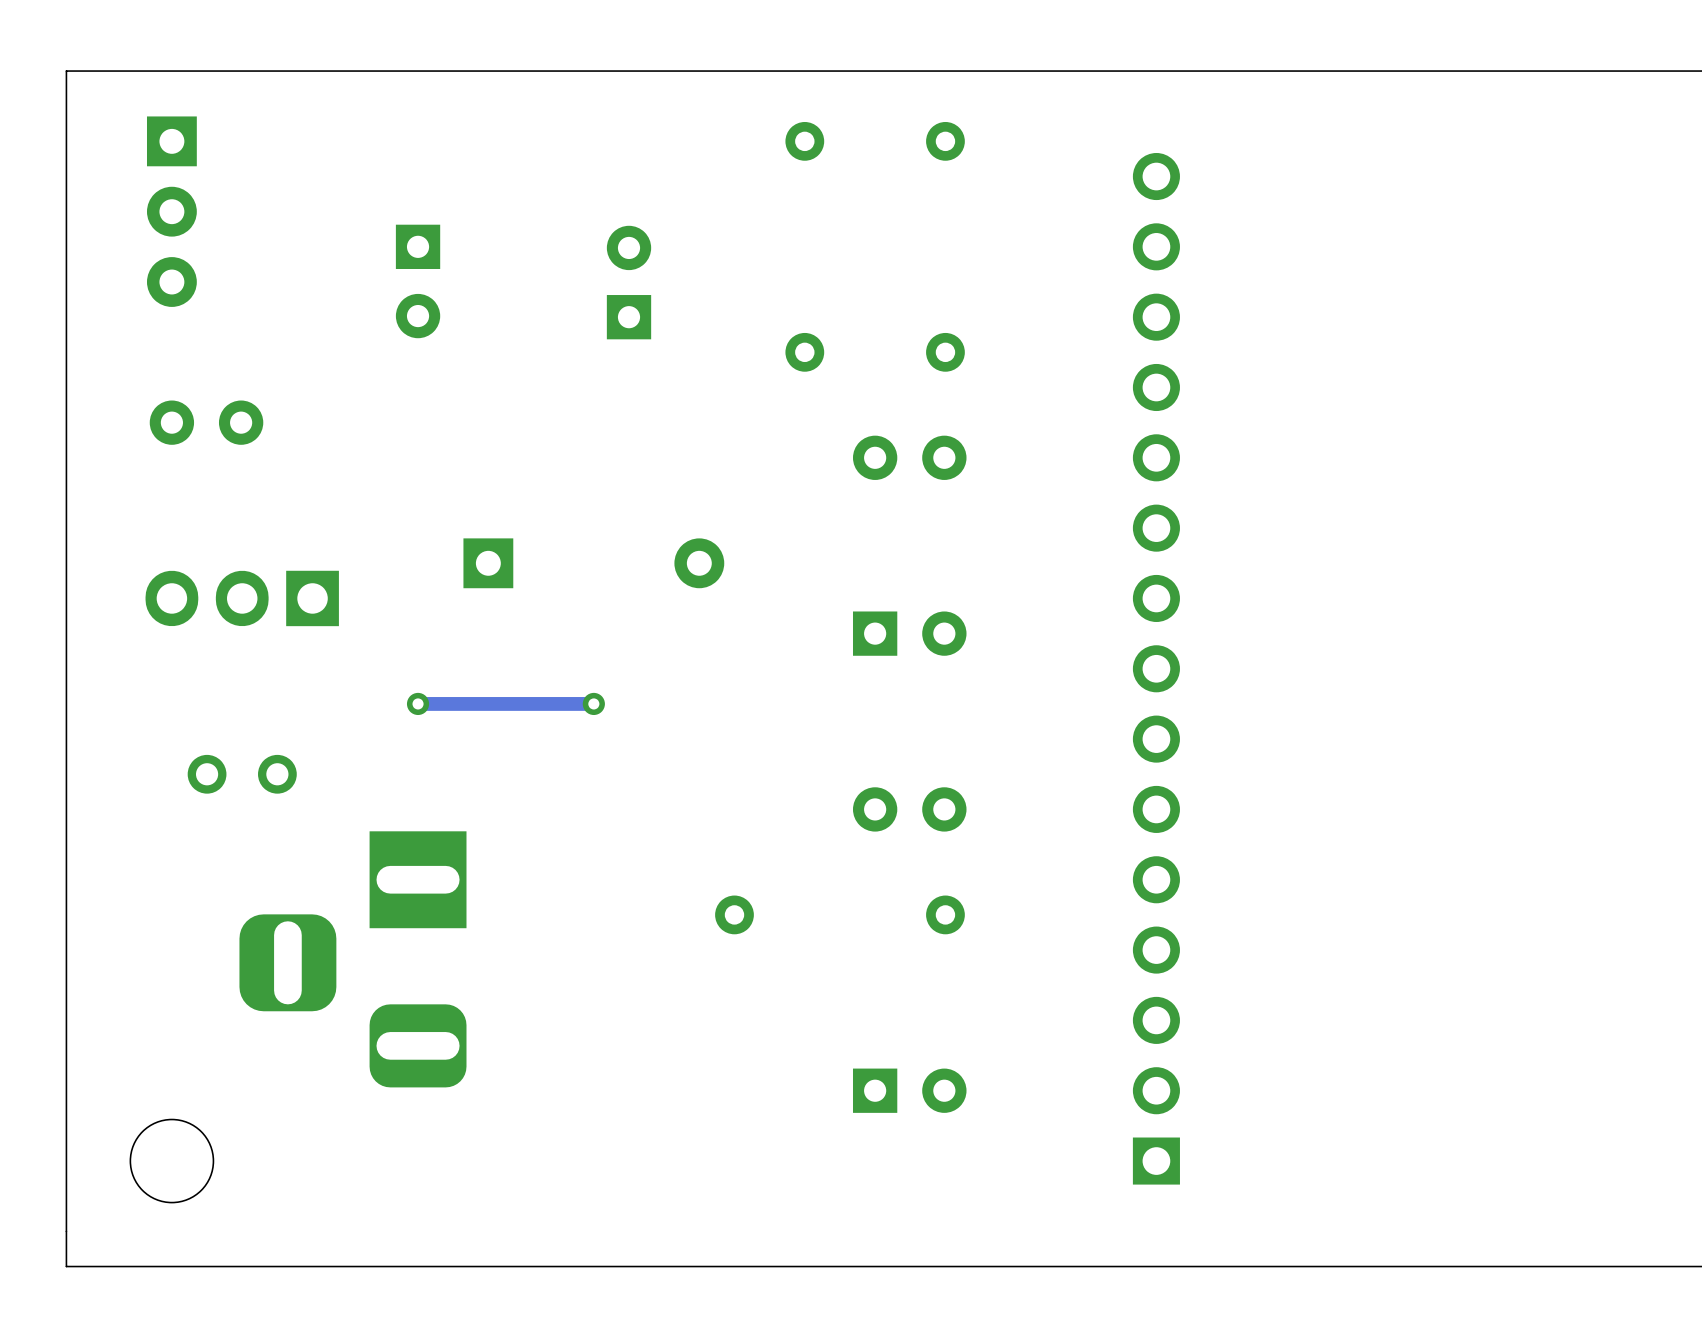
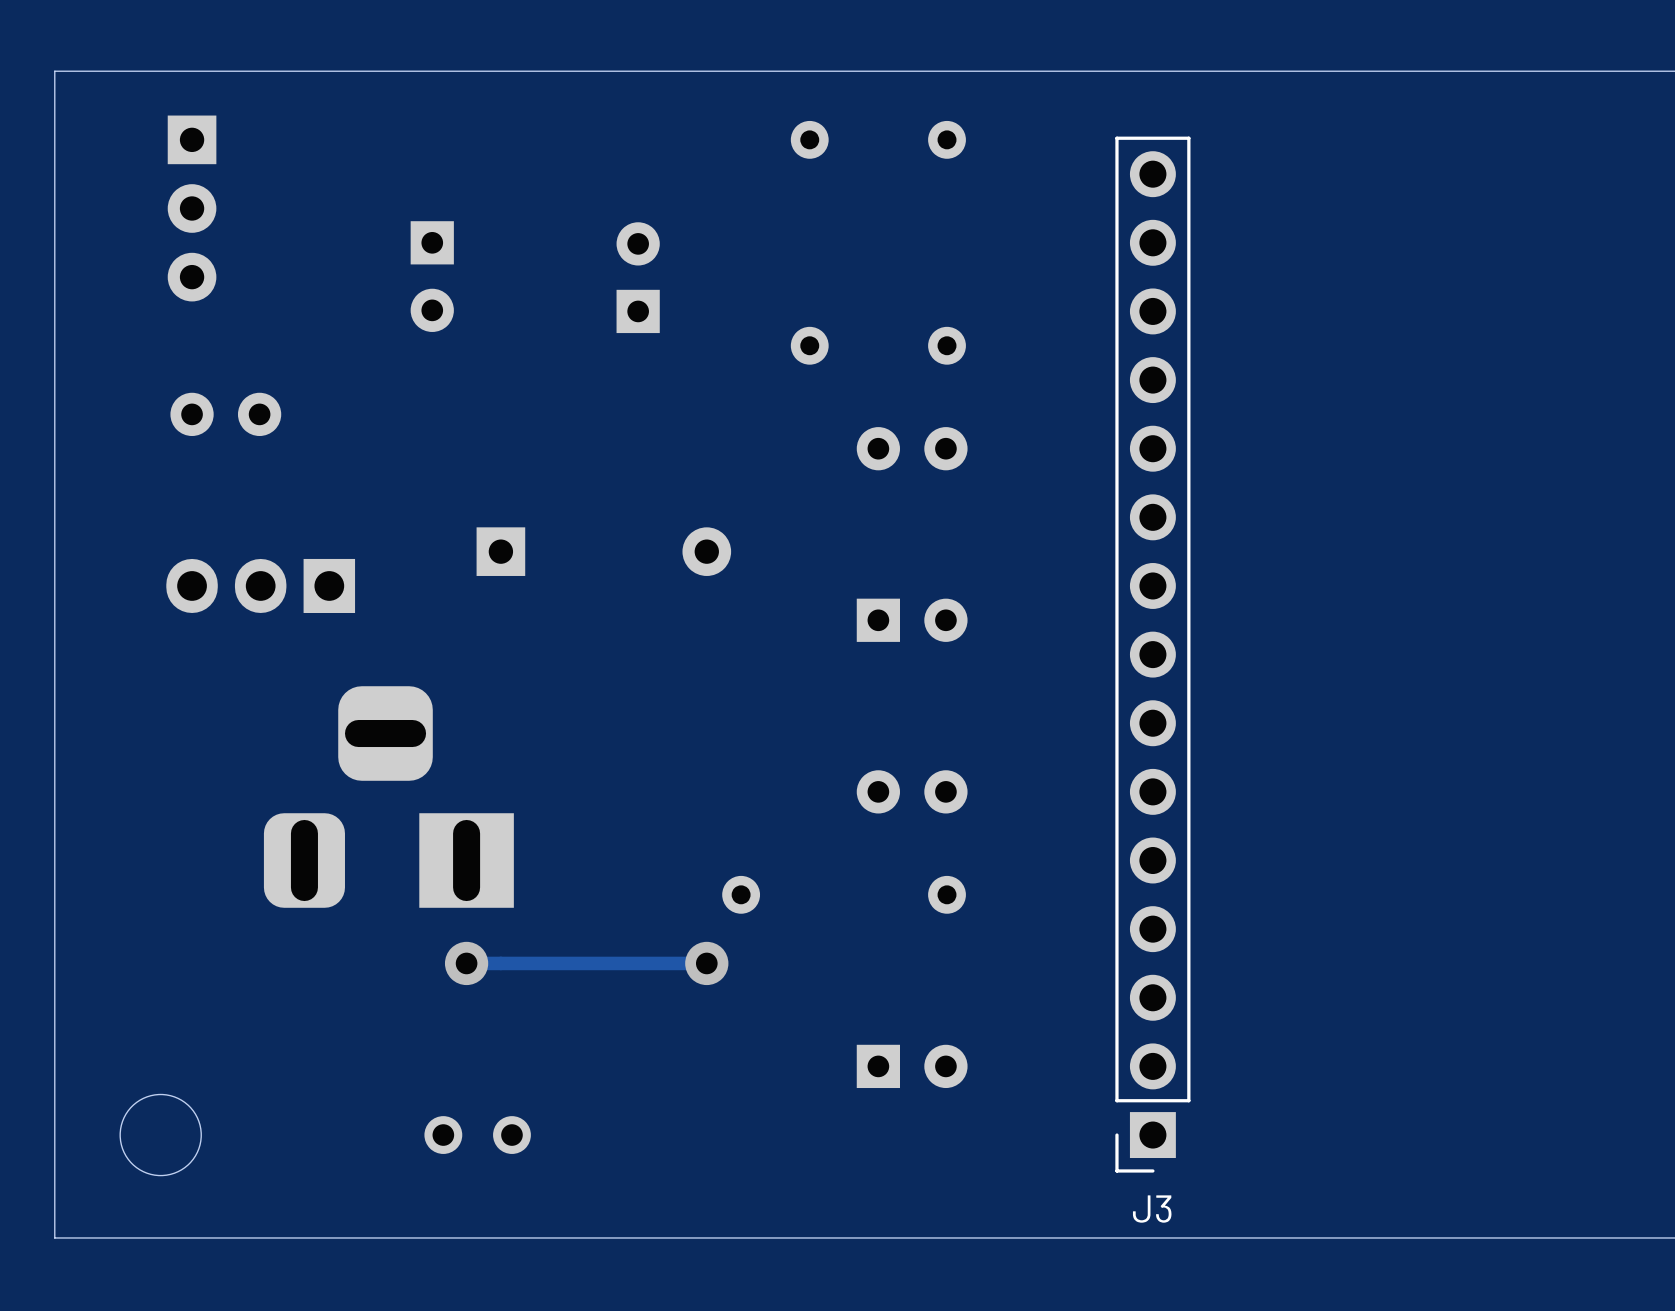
board edge: (66, 71) (66, 1266) -> (89, 71) (54, 71) (54, 1237) (89, 1237)
J3 side: top (1156, 668) -> bottom (1152, 654)
via: (418, 703) -> none
track: (593, 703) (418, 703) -> none
via: (593, 703) -> none
part position: (242, 774) -> (477, 1135)
part rotation: 0° (352, 959) -> 90° clockwise (388, 797)
via: none -> (466, 963)
track: none -> (706, 963) (466, 963)
via: none -> (706, 963)
round board edge position: (171, 1161) -> (160, 1135)

